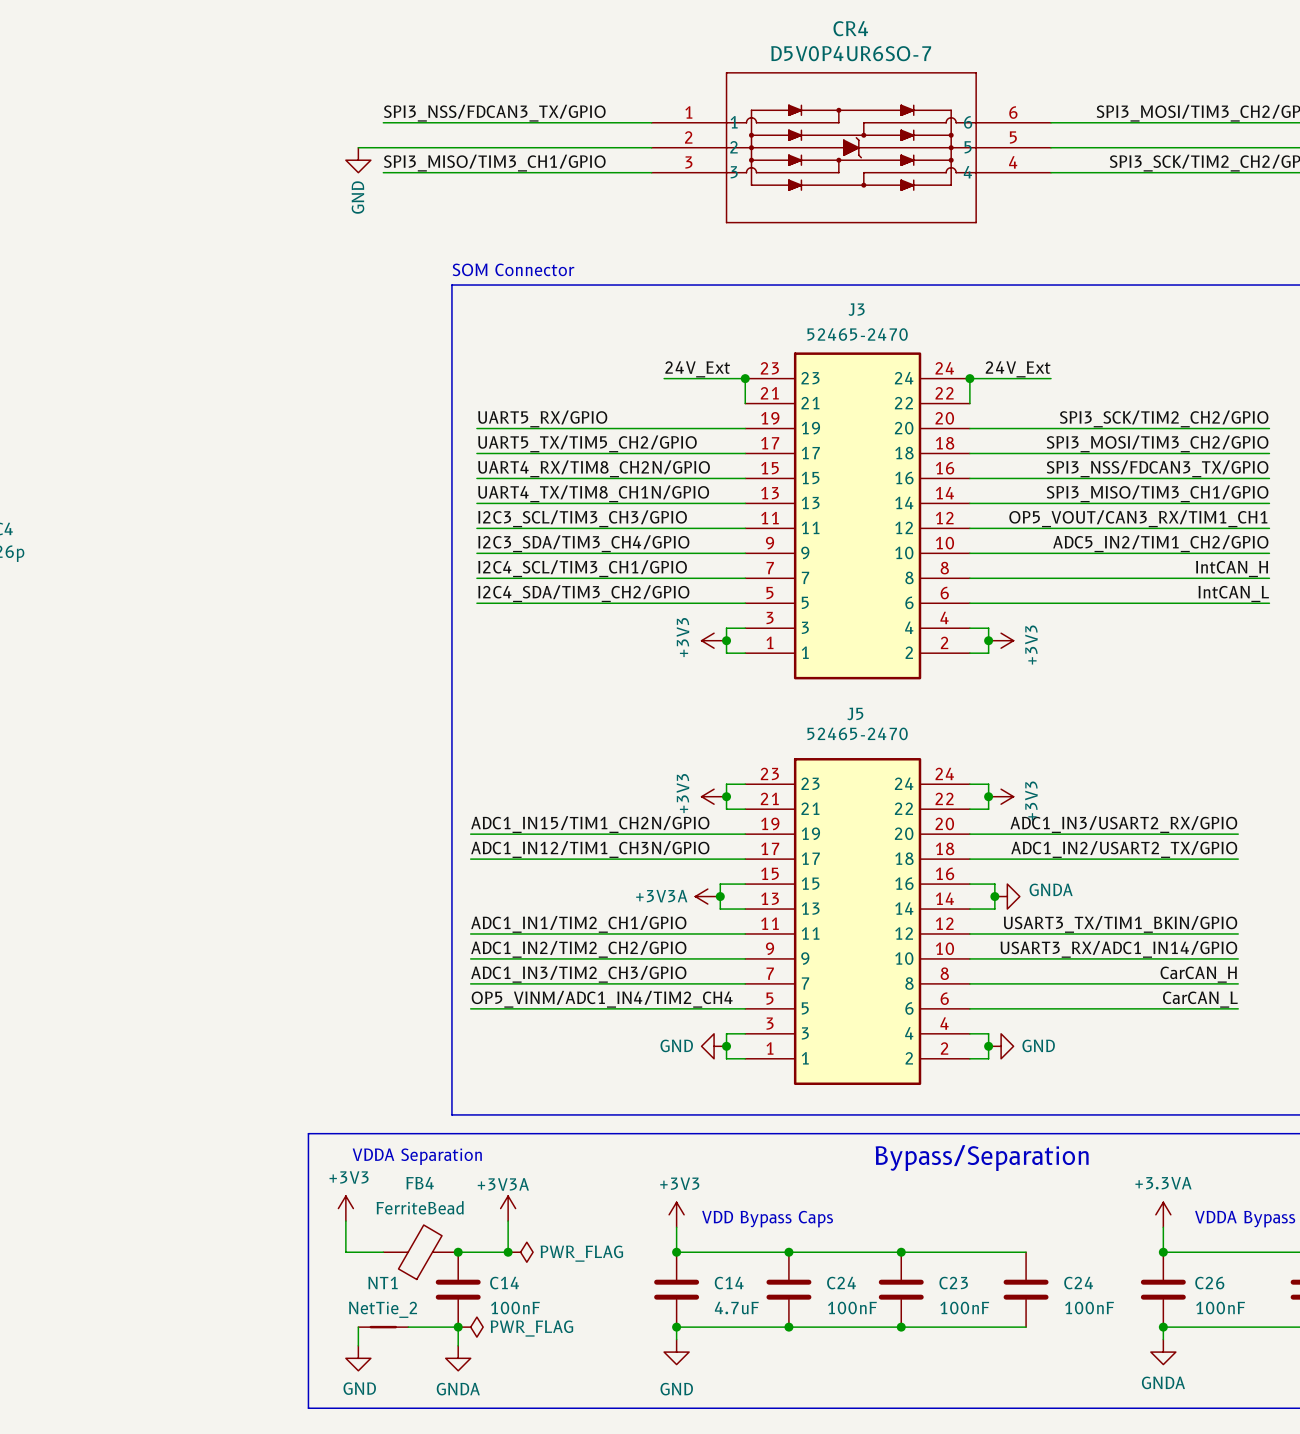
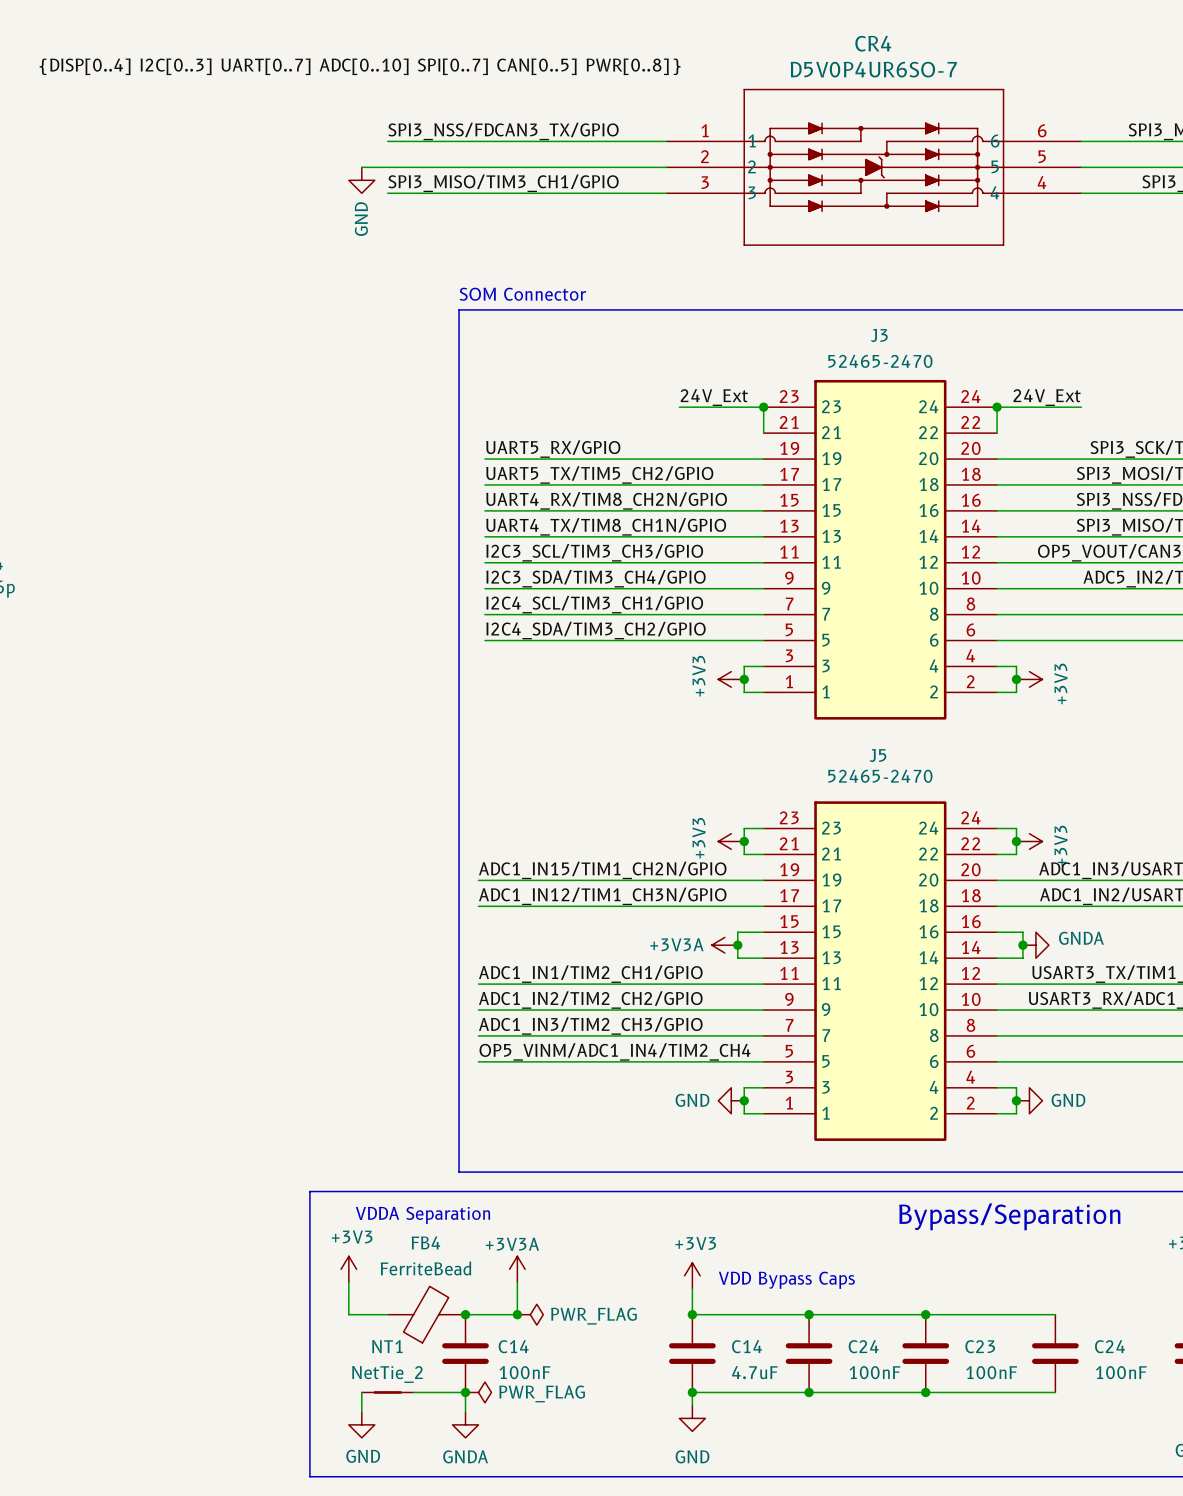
label: none -> {DISP[0..4] I2C[0..3] UART[0..7] ADC[0..10] SPI[0..7] CAN[0..5] PWR[0..8]} (360, 66)

